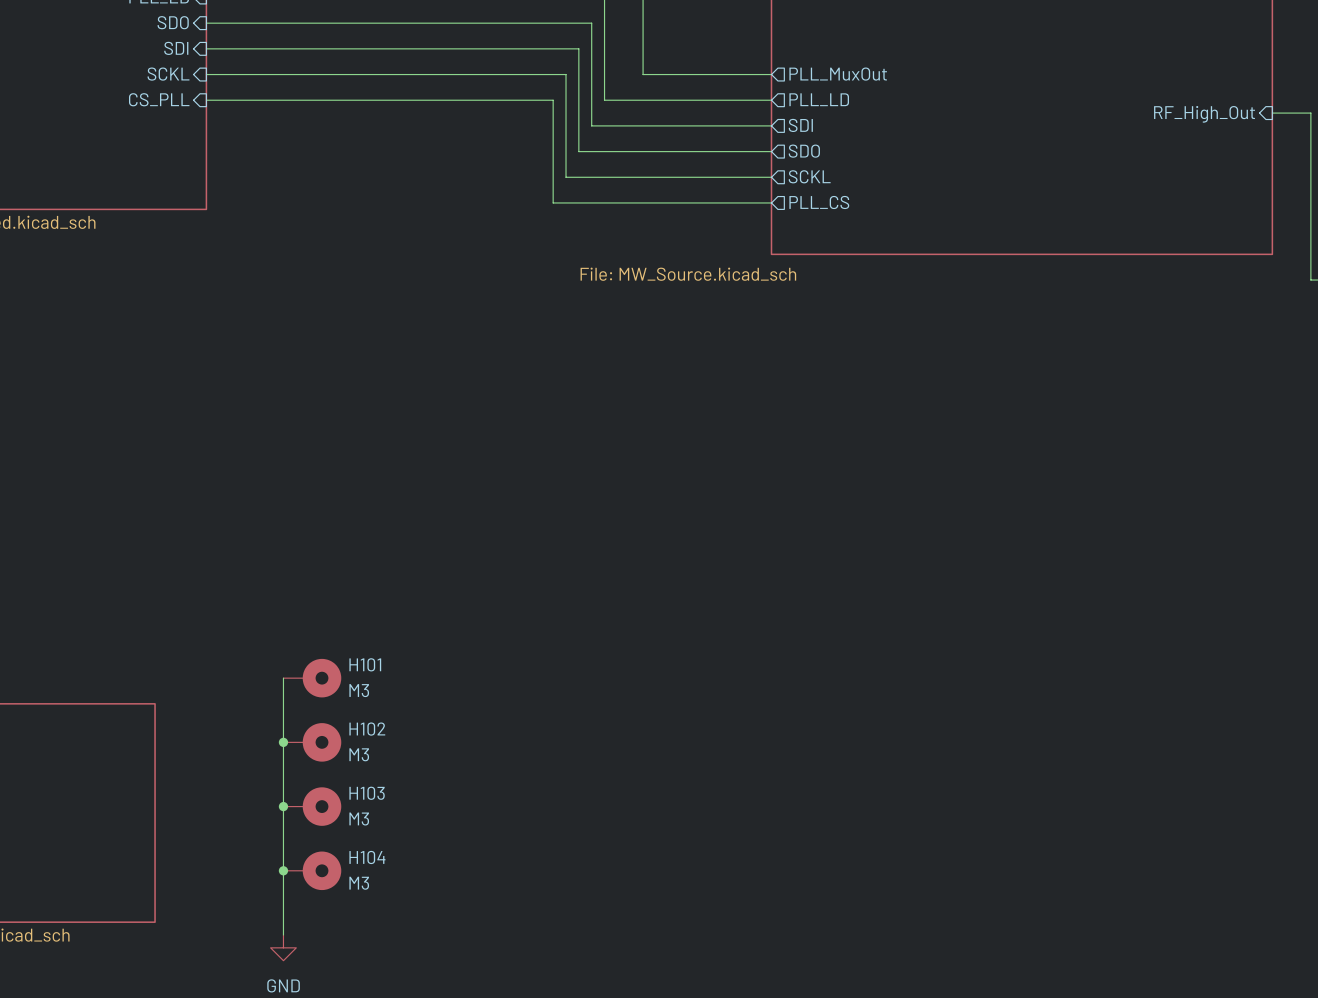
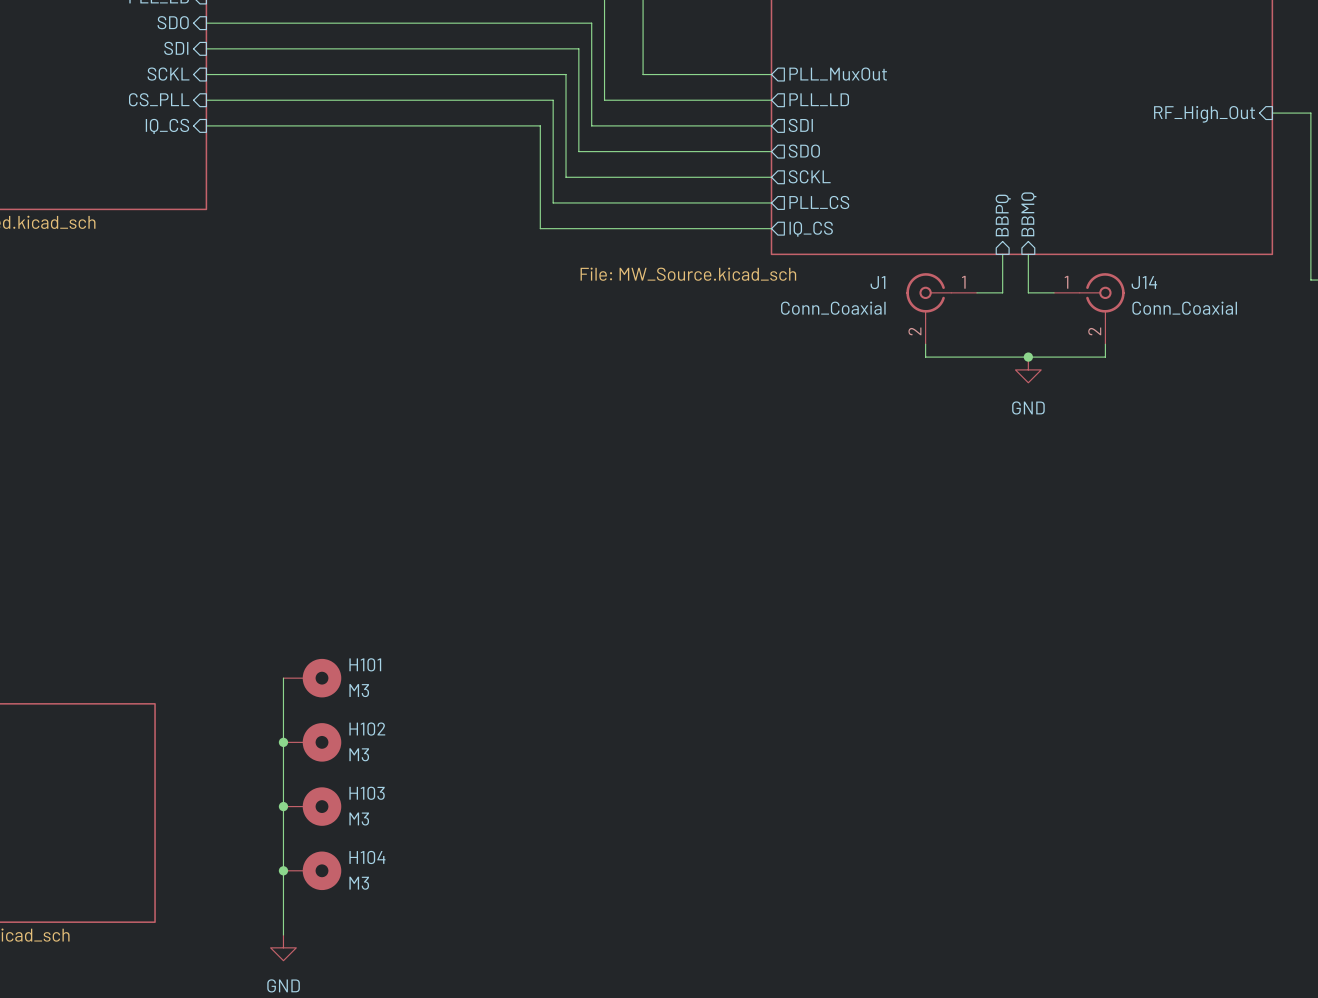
wire: none -> (206, 125) (540, 125) (540, 228) (771, 228)
sheet pin: none -> IQ_CS (167, 126)
sheet pin: none -> BBMQ (1028, 214)
sheet pin: none -> BBPQ (1003, 215)
sheet pin: none -> IQ_CS (811, 229)
wire: none -> (1002, 254) (1002, 292) (976, 292)
wire: none -> (1028, 254) (1028, 292) (1054, 292)
J1: none -> Conn_Coaxial (941, 308)
J14: none -> Conn_Coaxial (1089, 308)
wire: none -> (925, 344) (925, 357) (1105, 357) (1105, 344)
junction: none -> (1028, 357)
power symbol: none -> GND (1028, 369)

